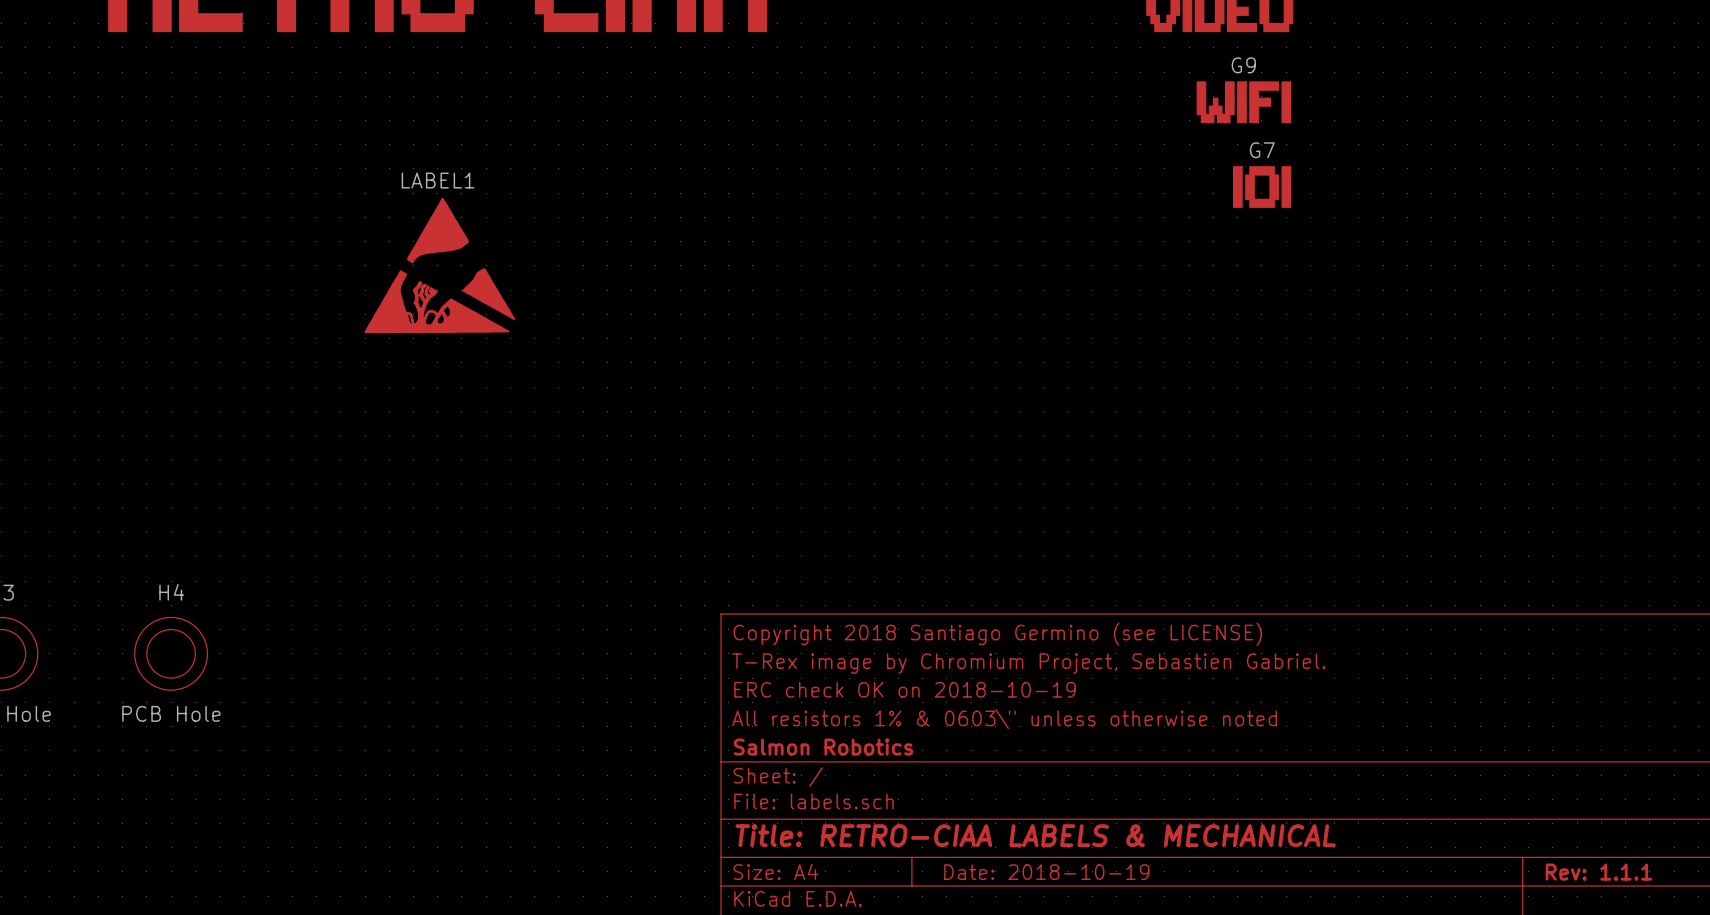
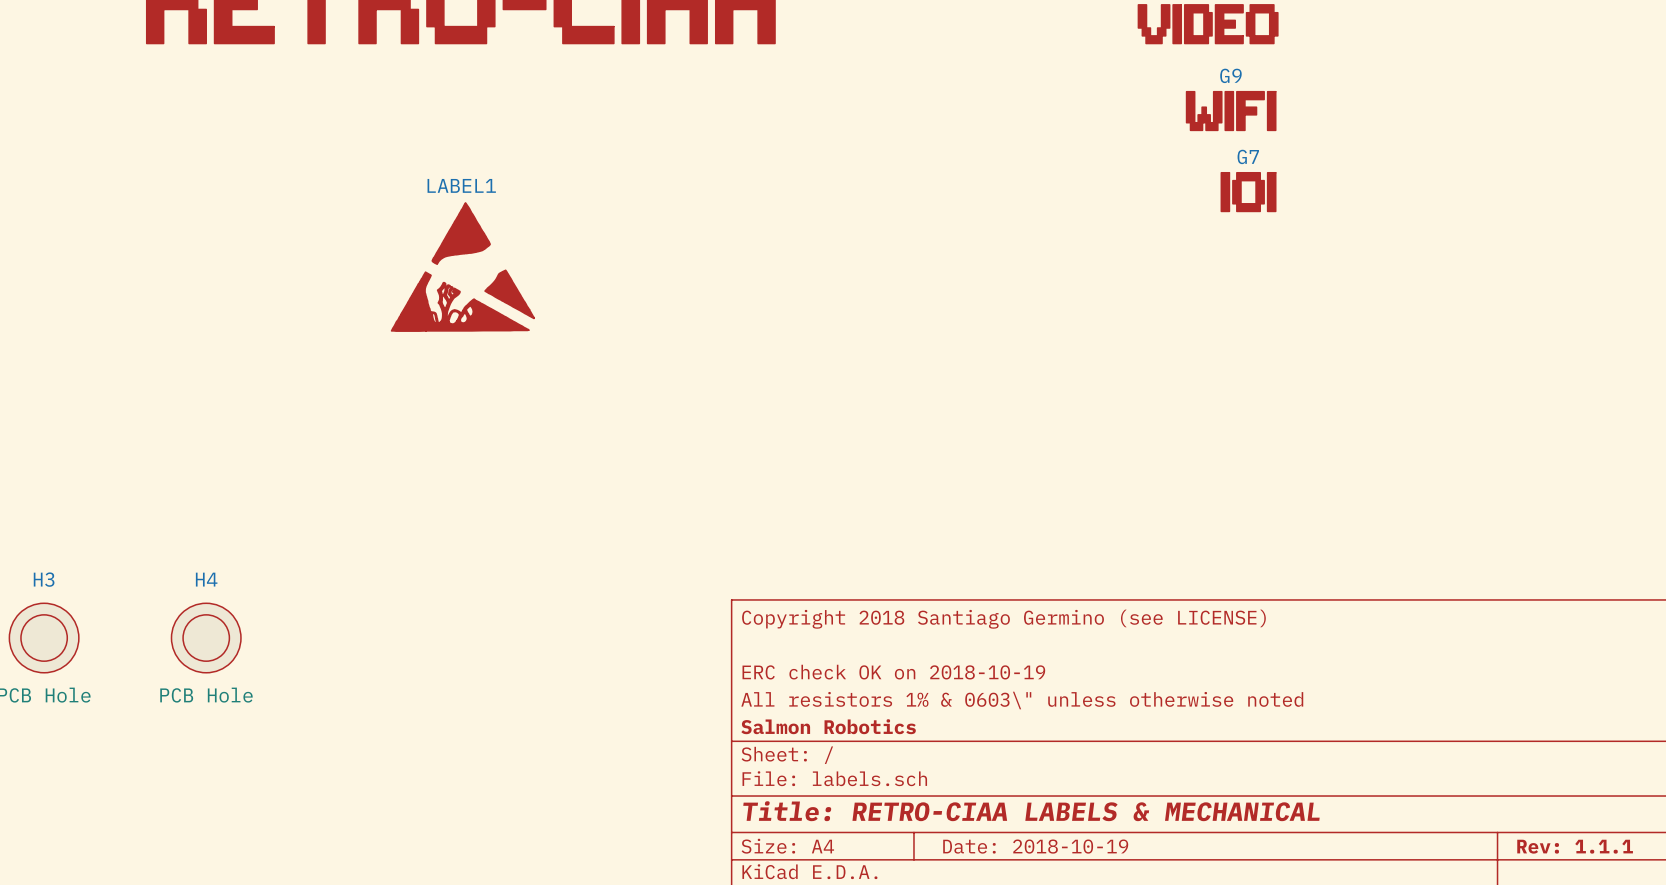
title block: T-Rex image by Chromium Project, Sebastien Gabriel. (1028, 663) -> none

